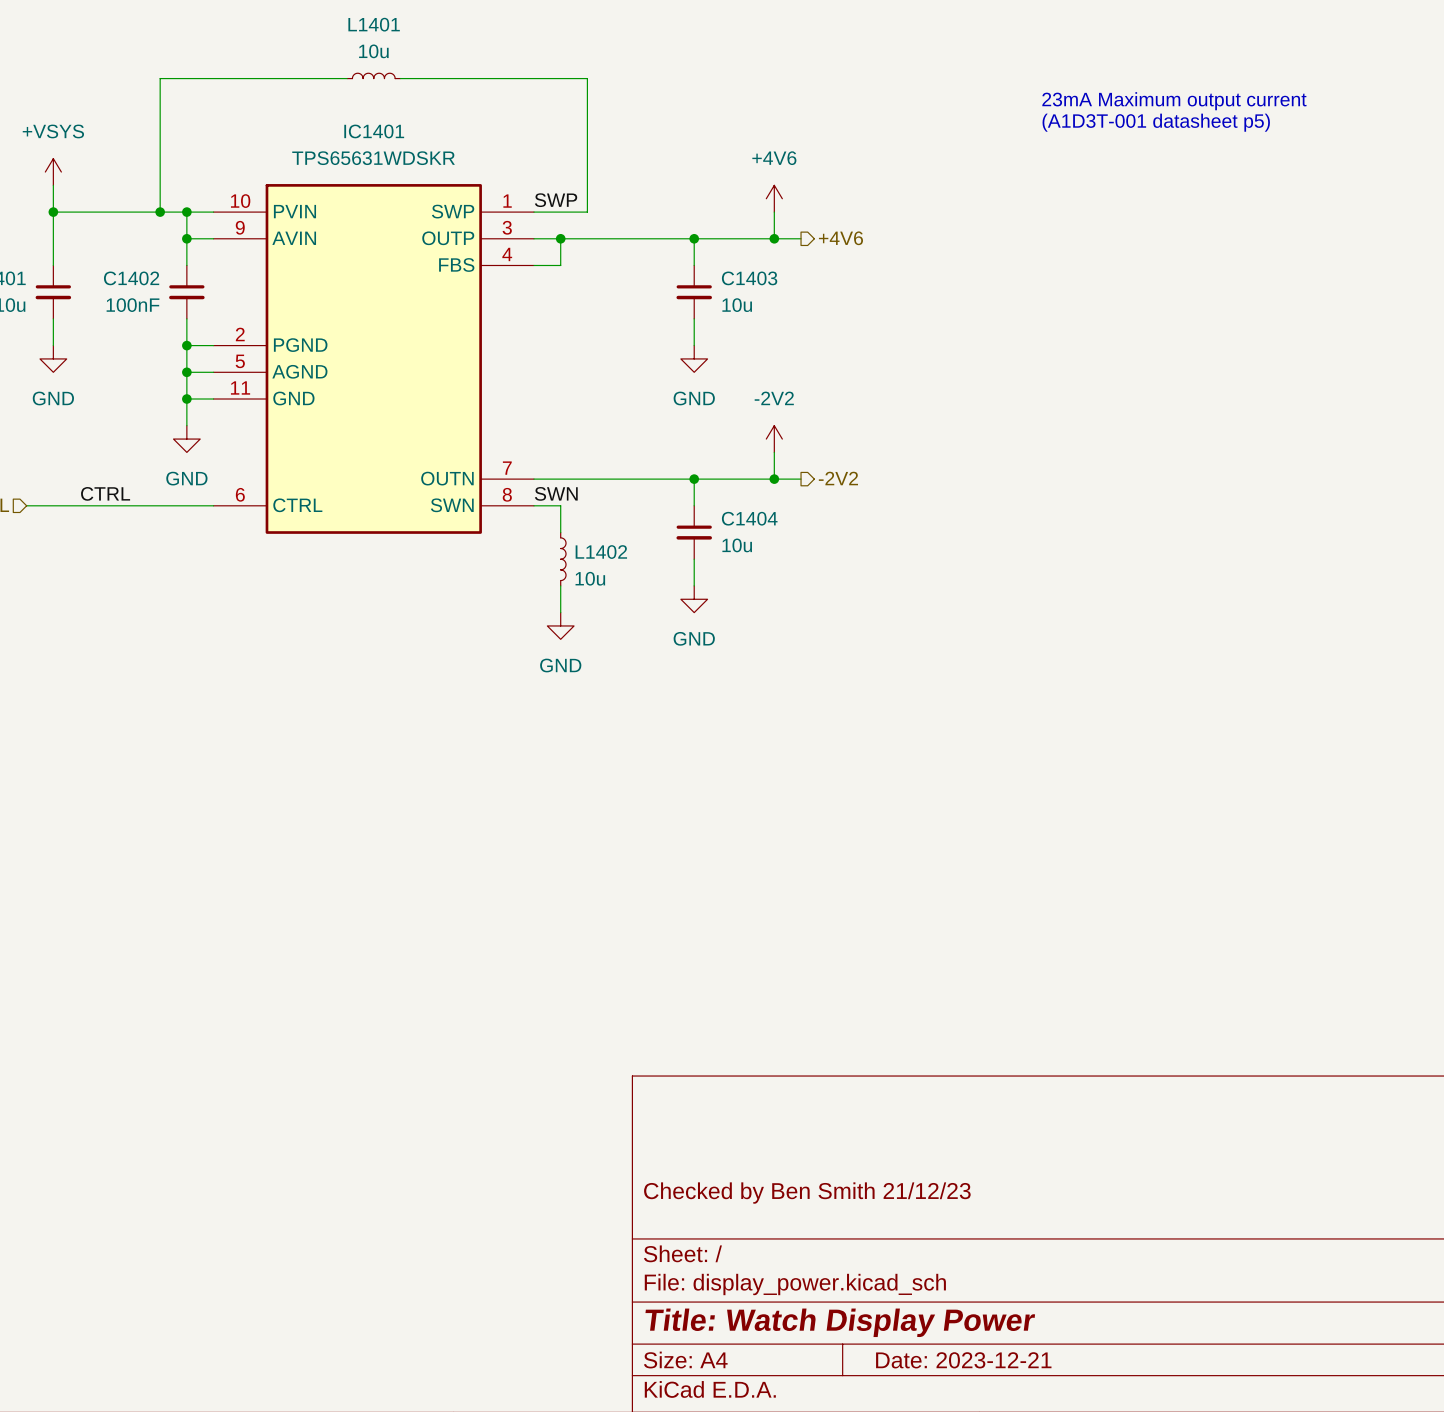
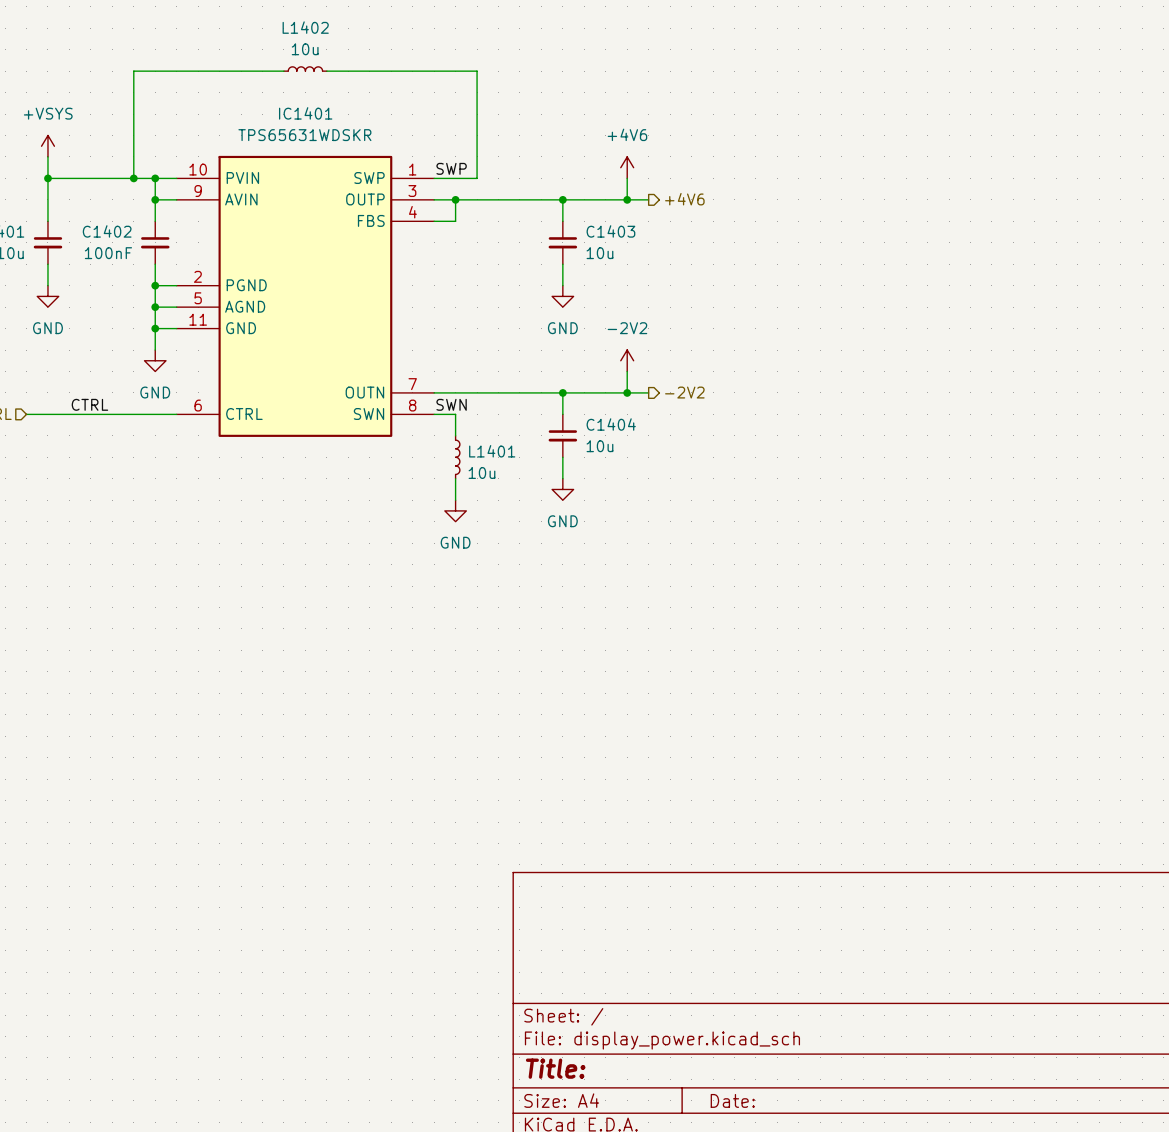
L1401 name: L1401 (374, 24) -> L1402 (305, 27)
text: 23mA Maximum output current (1174, 101) -> none
text: (A1D3T-001 datasheet p5) (1156, 122) -> none
L1402 name: L1402 (601, 552) -> L1401 (492, 451)
title block: Checked by Ben Smith 21/12/23 (807, 1193) -> none
title block: Title: Watch Display Power (840, 1322) -> Title: (555, 1068)
title block: Date: 2023-12-21 (963, 1360) -> Date: (732, 1100)

